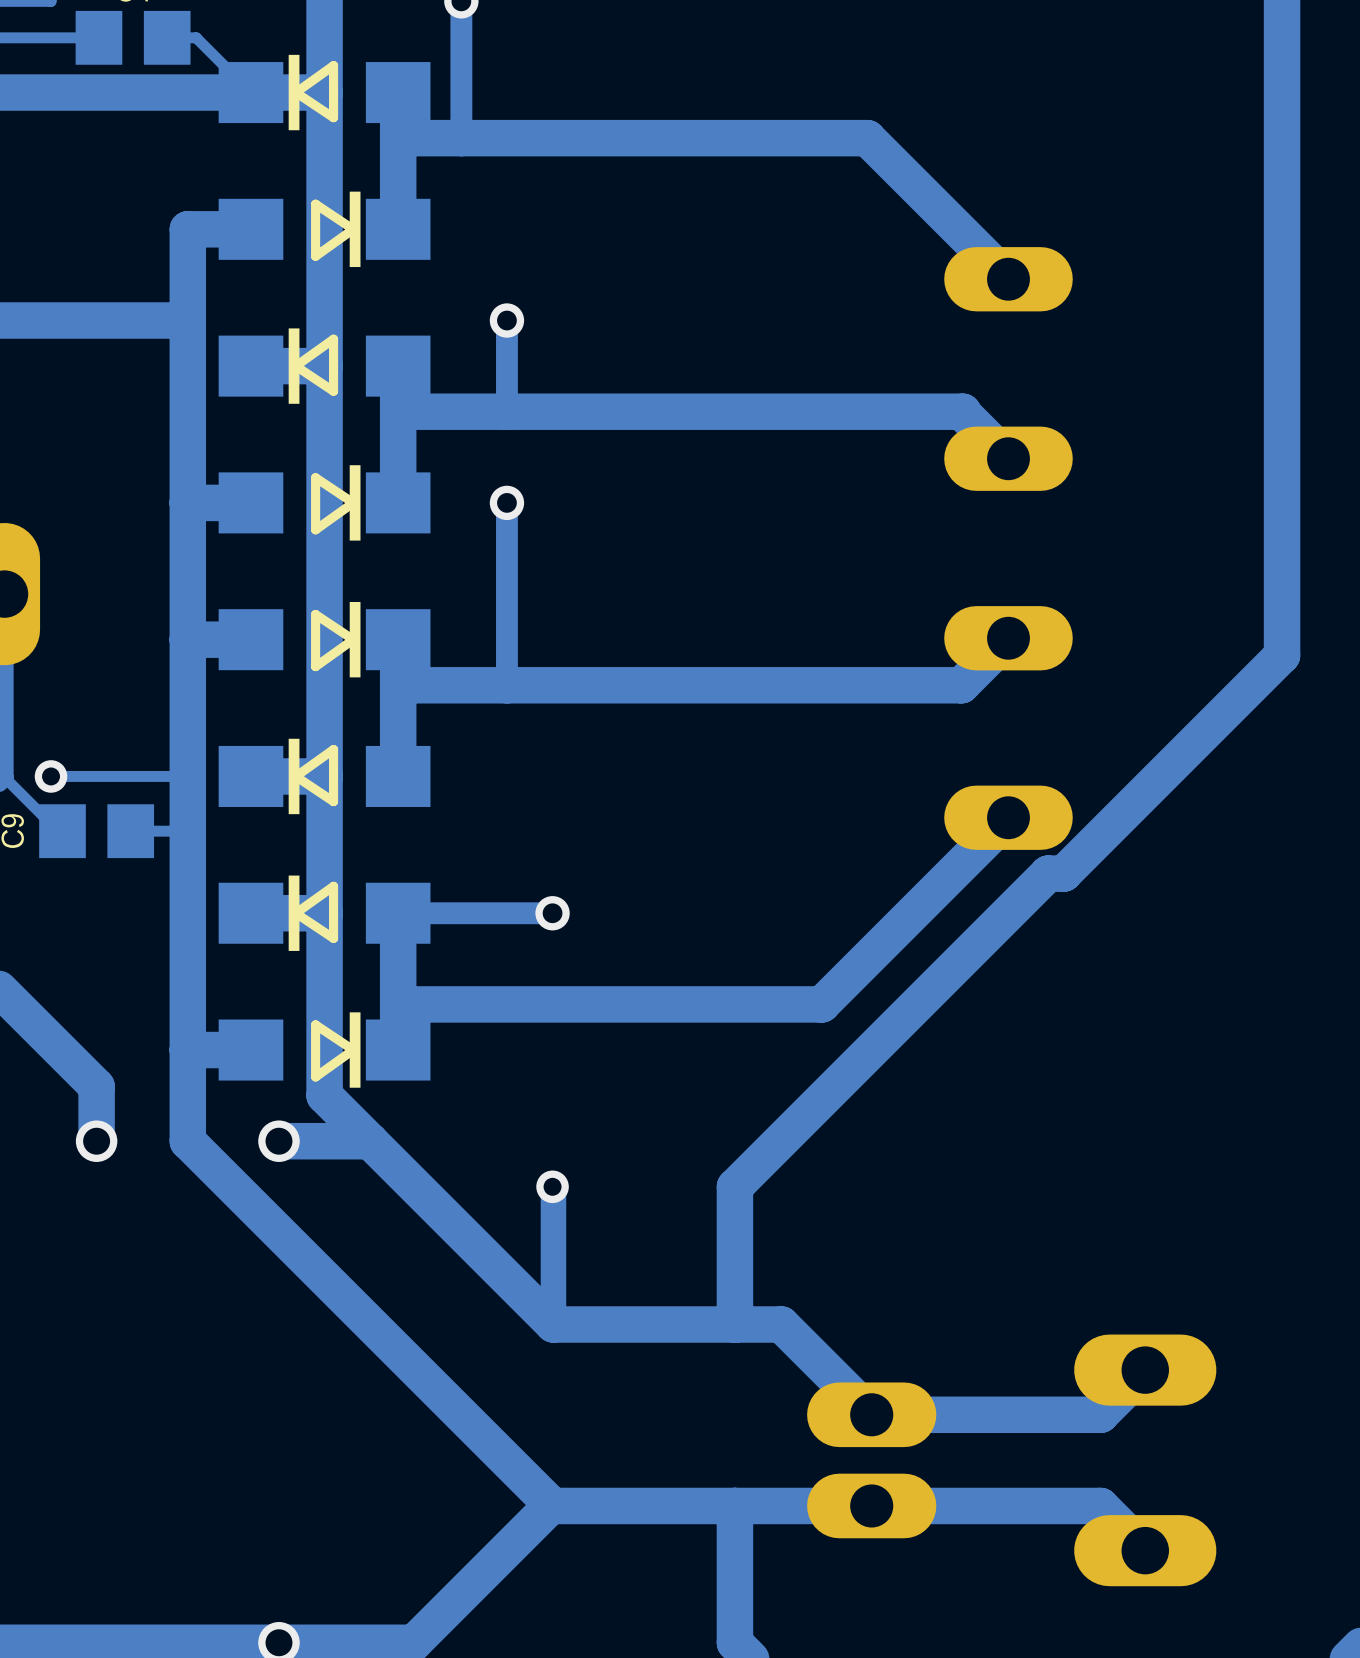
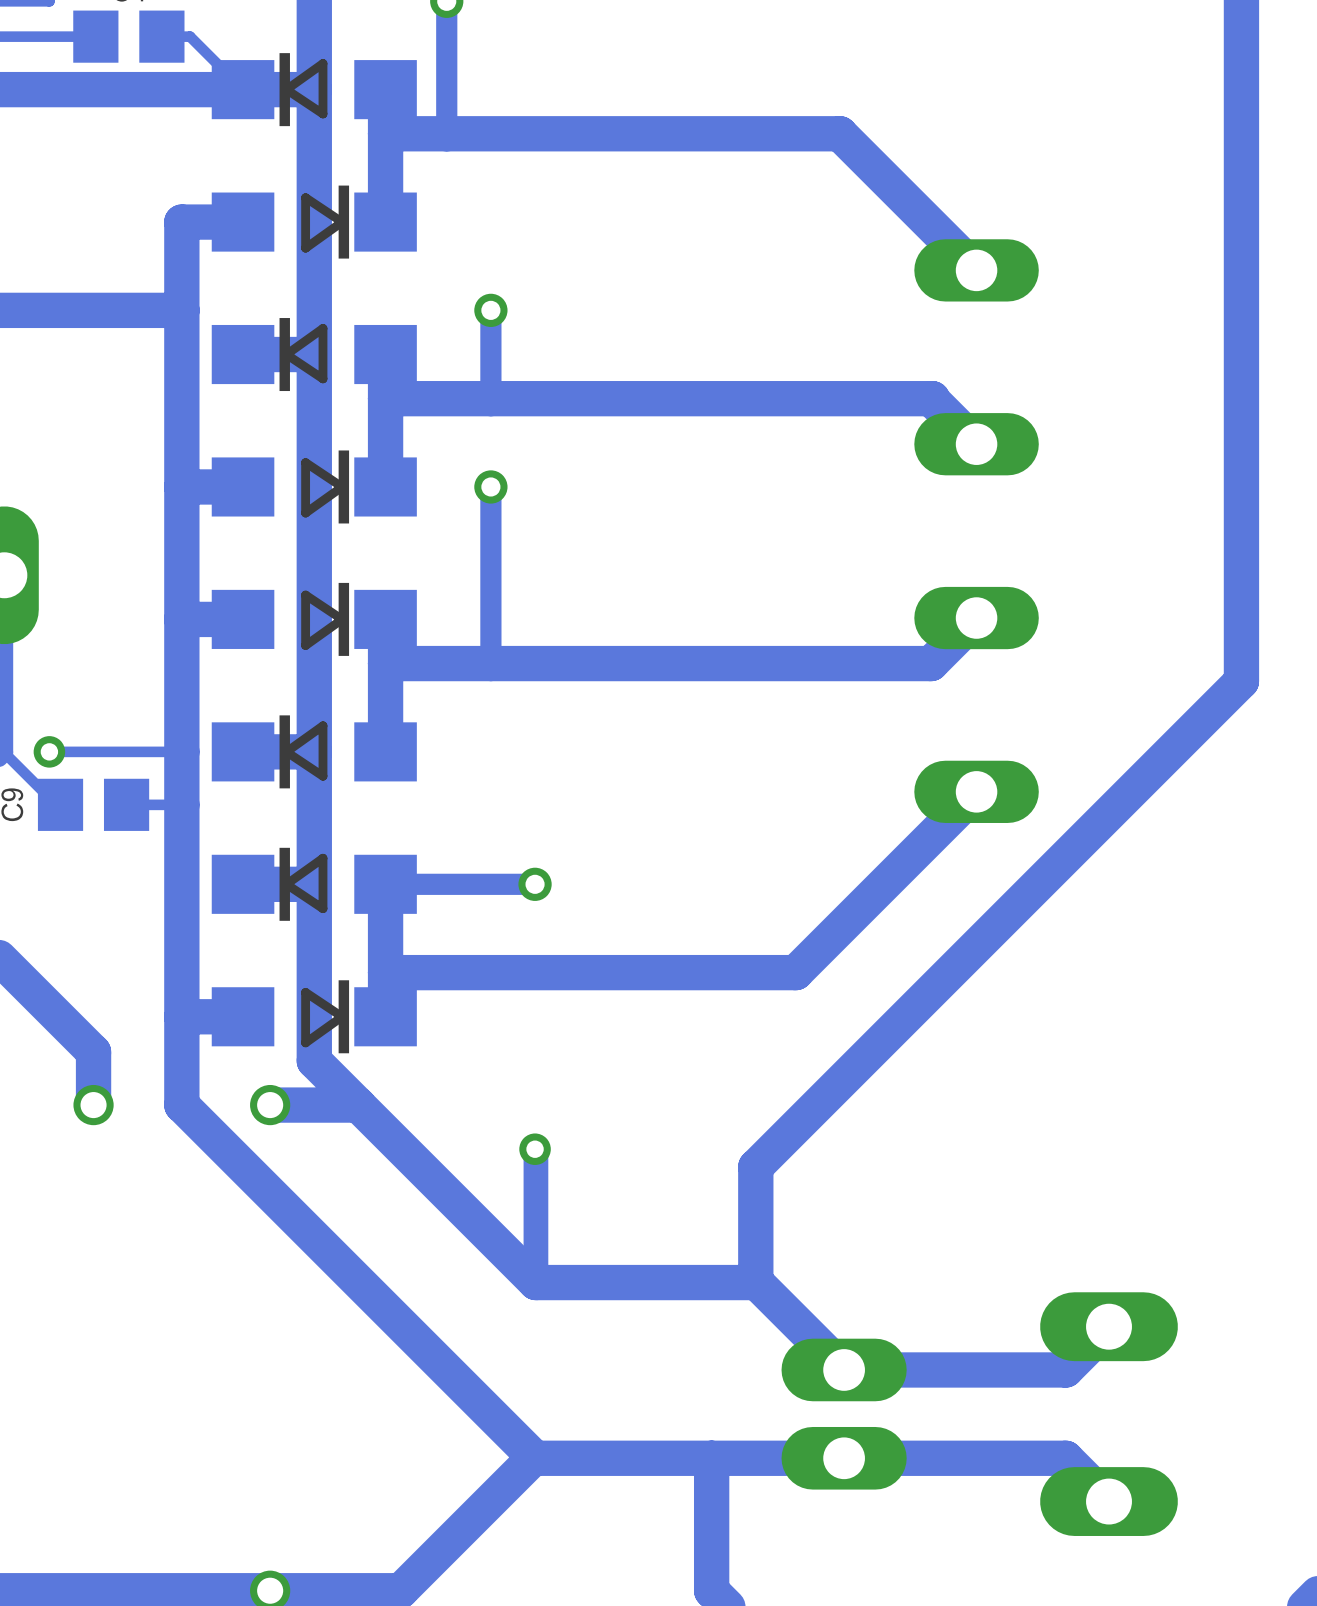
track: (1282, 655) (1063, 873) (1048, 873) (734, 1186) (734, 1324) -> (1241, 634) (1241, 681) (755, 1166) (756, 1282)

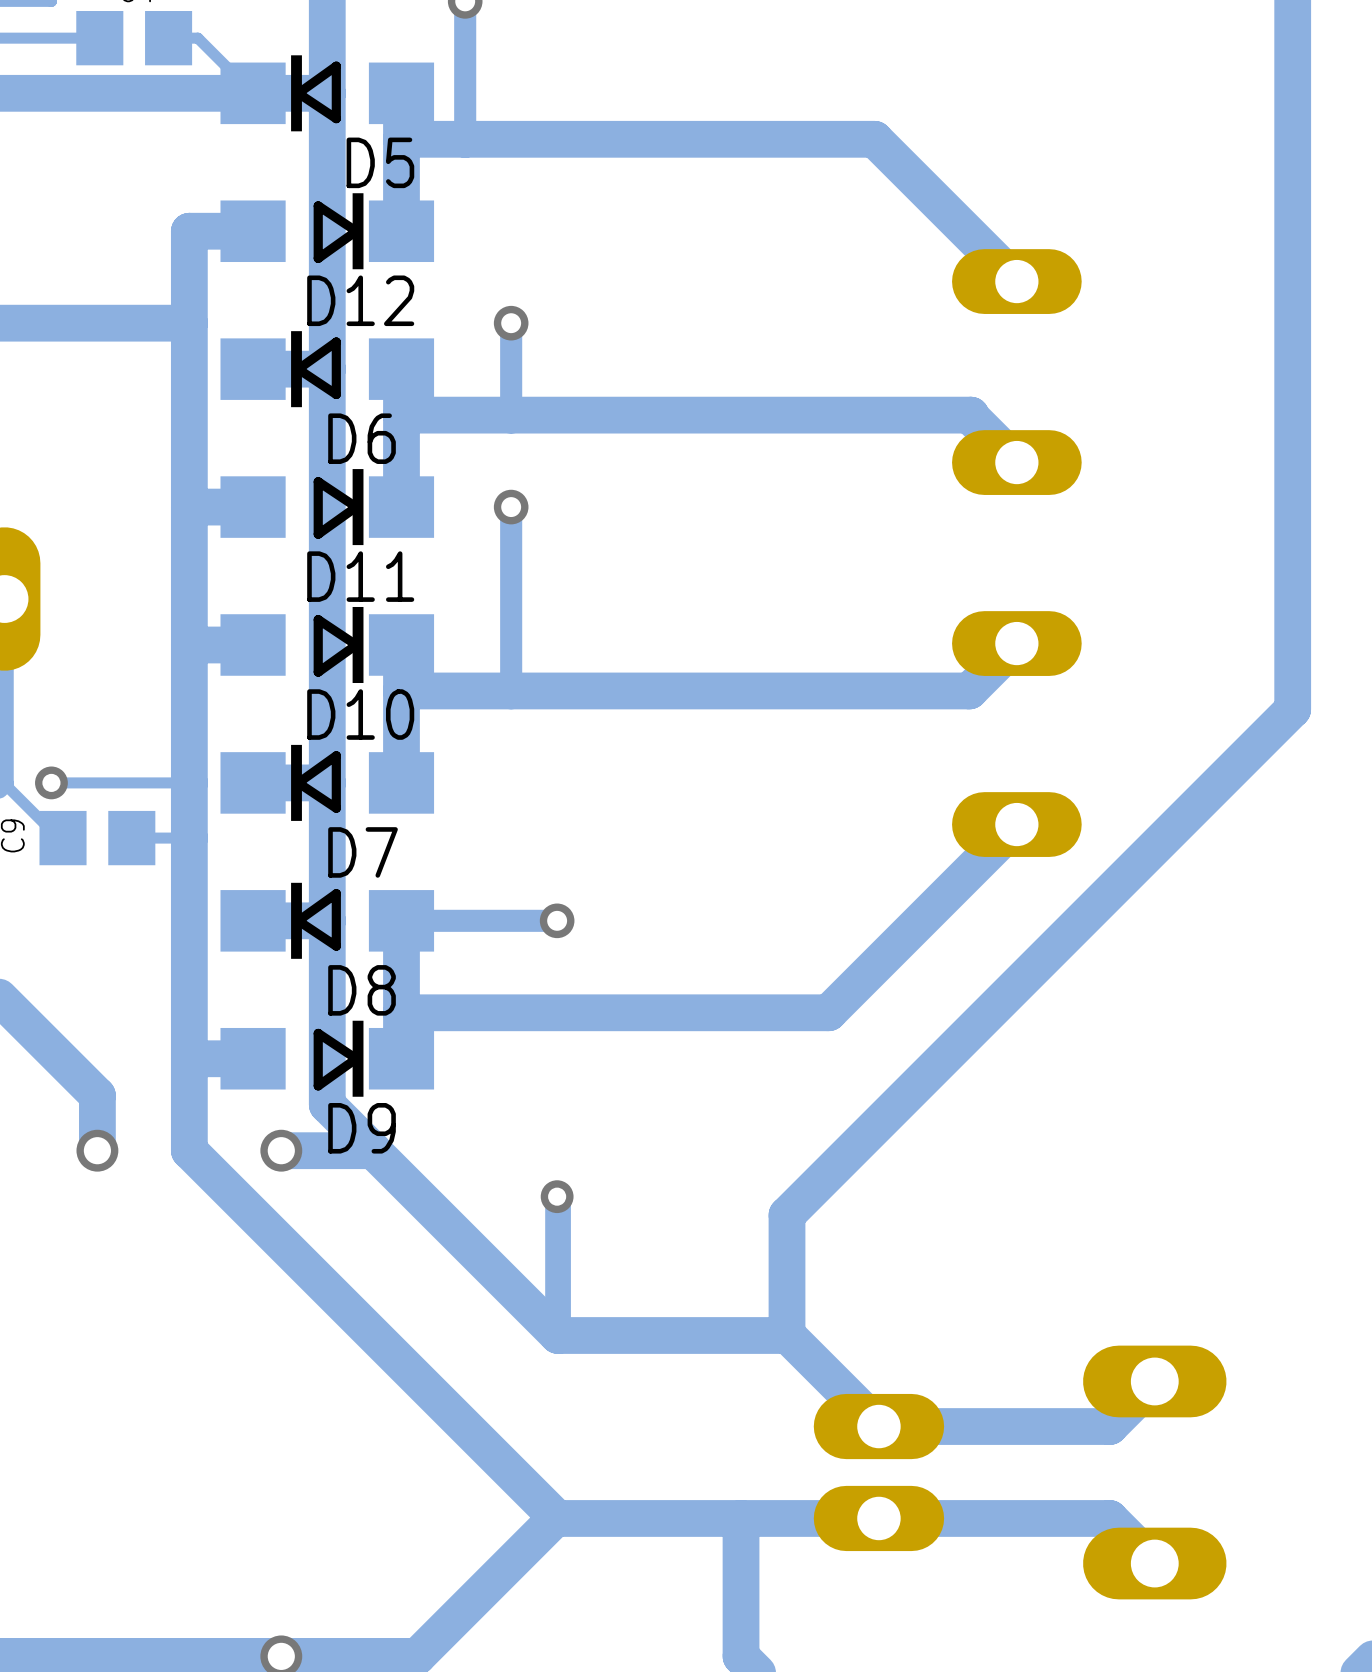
D5 name: none -> D5 (380, 162)
D12 name: none -> D12 (360, 300)
D6 name: none -> D6 (362, 438)
D11 name: none -> D11 (360, 576)
D10 name: none -> D10 (360, 714)
D7 name: none -> D7 (363, 852)
D8 name: none -> D8 (362, 990)
D9 name: none -> D9 (362, 1128)

